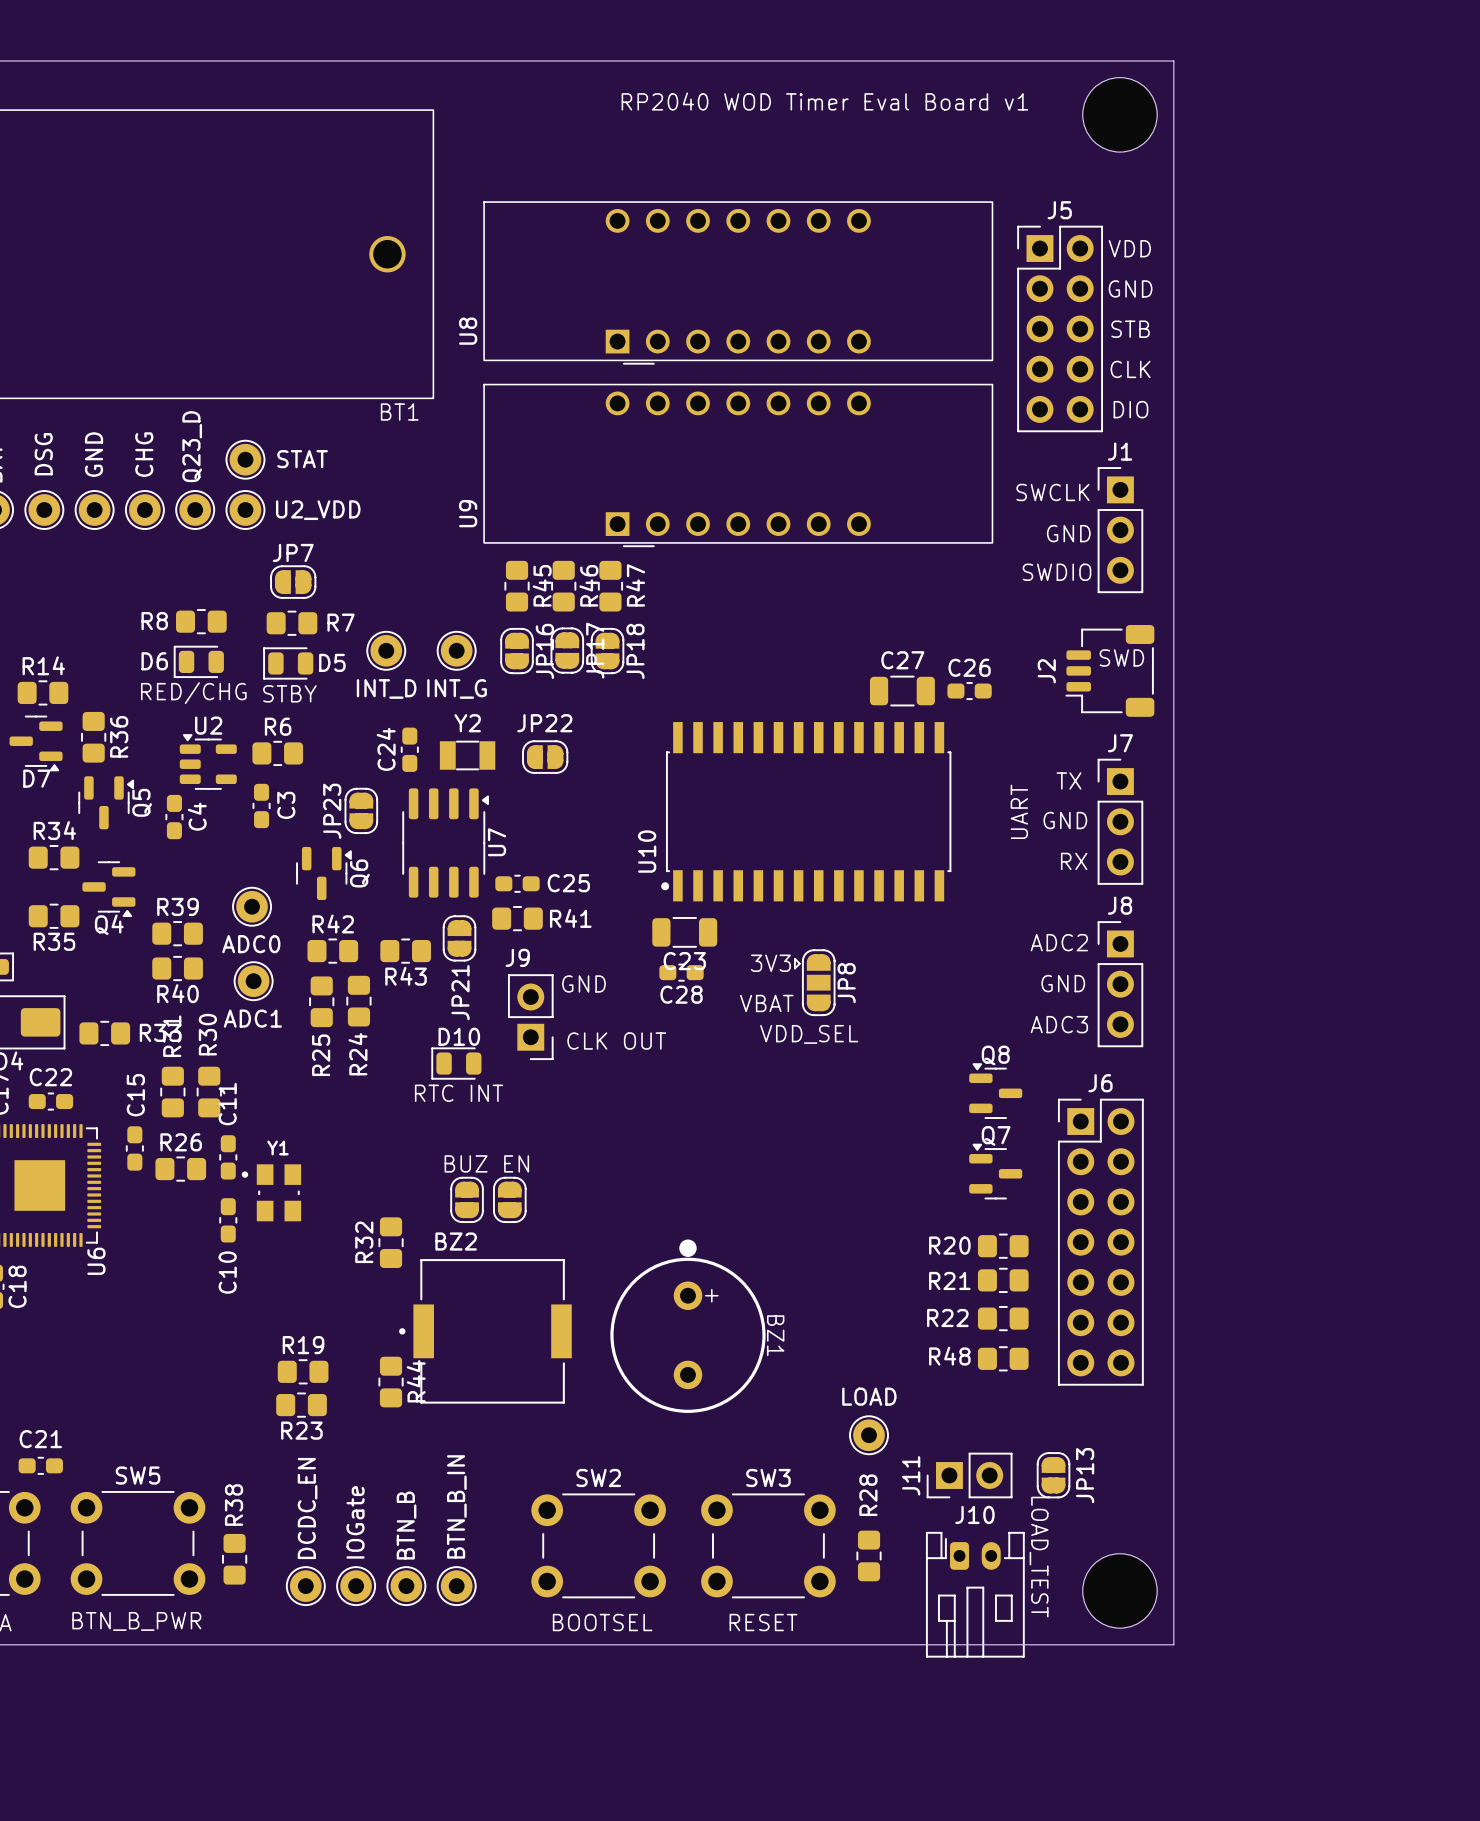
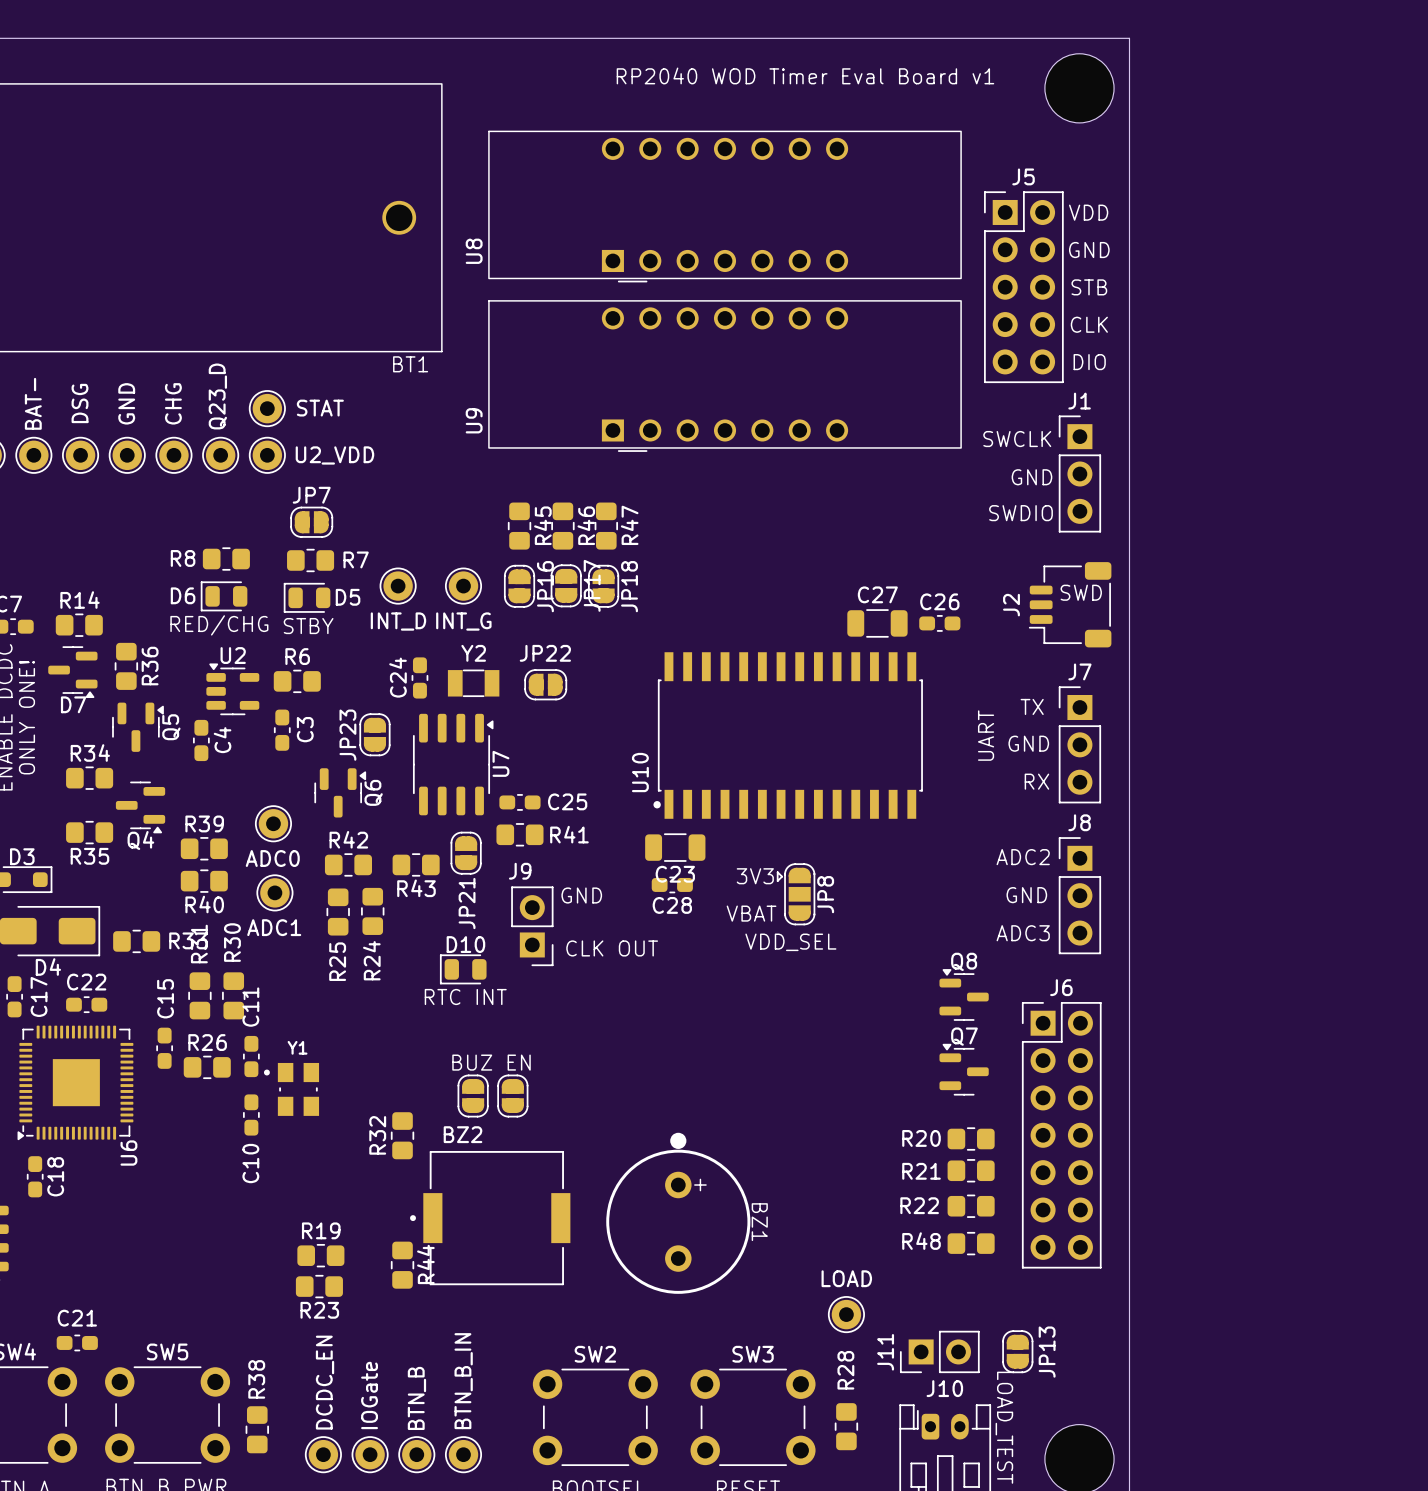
U8 position: (738, 282) -> (725, 206)
U9 position: (738, 465) -> (725, 376)

